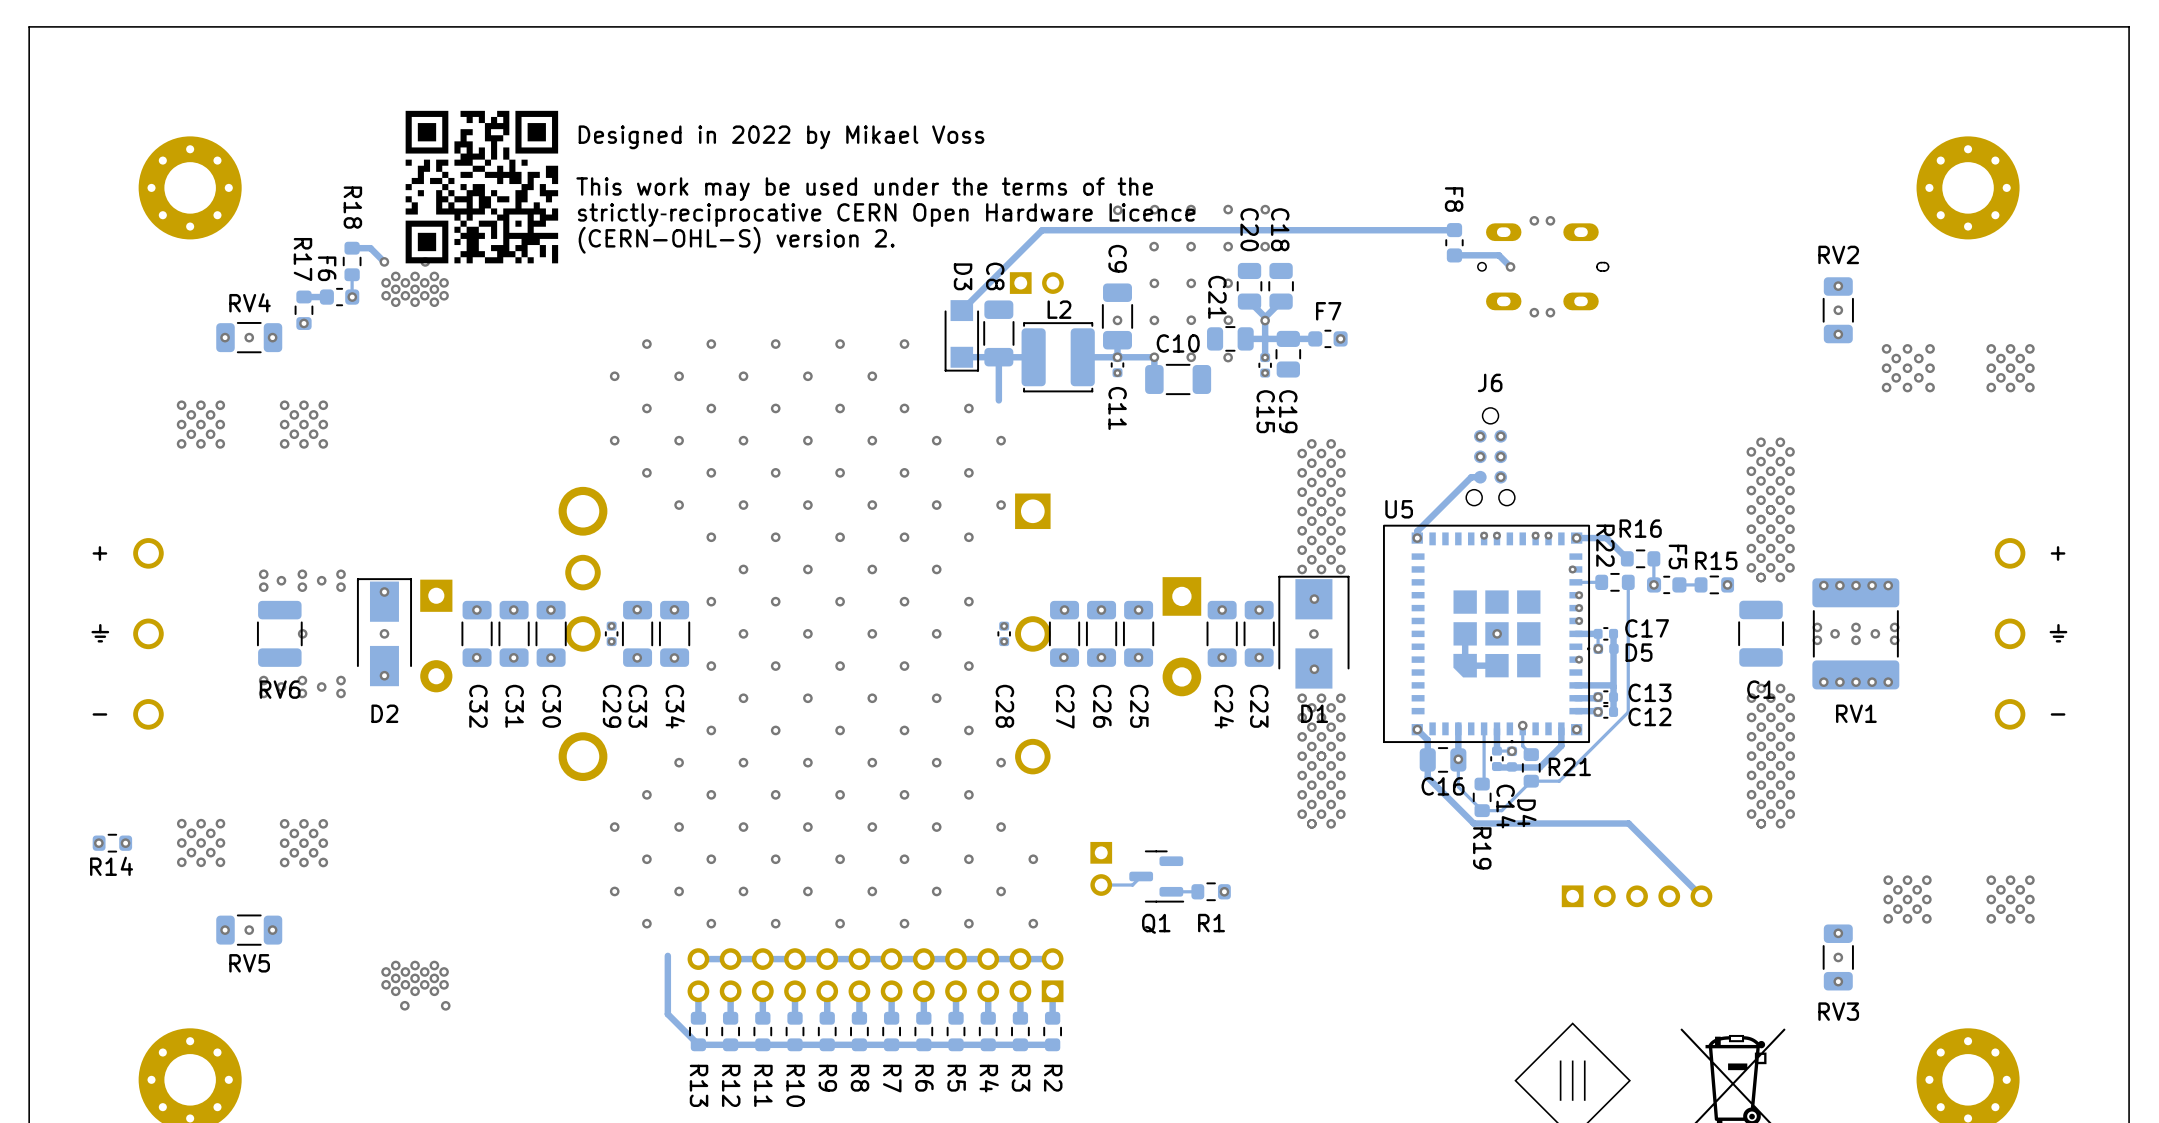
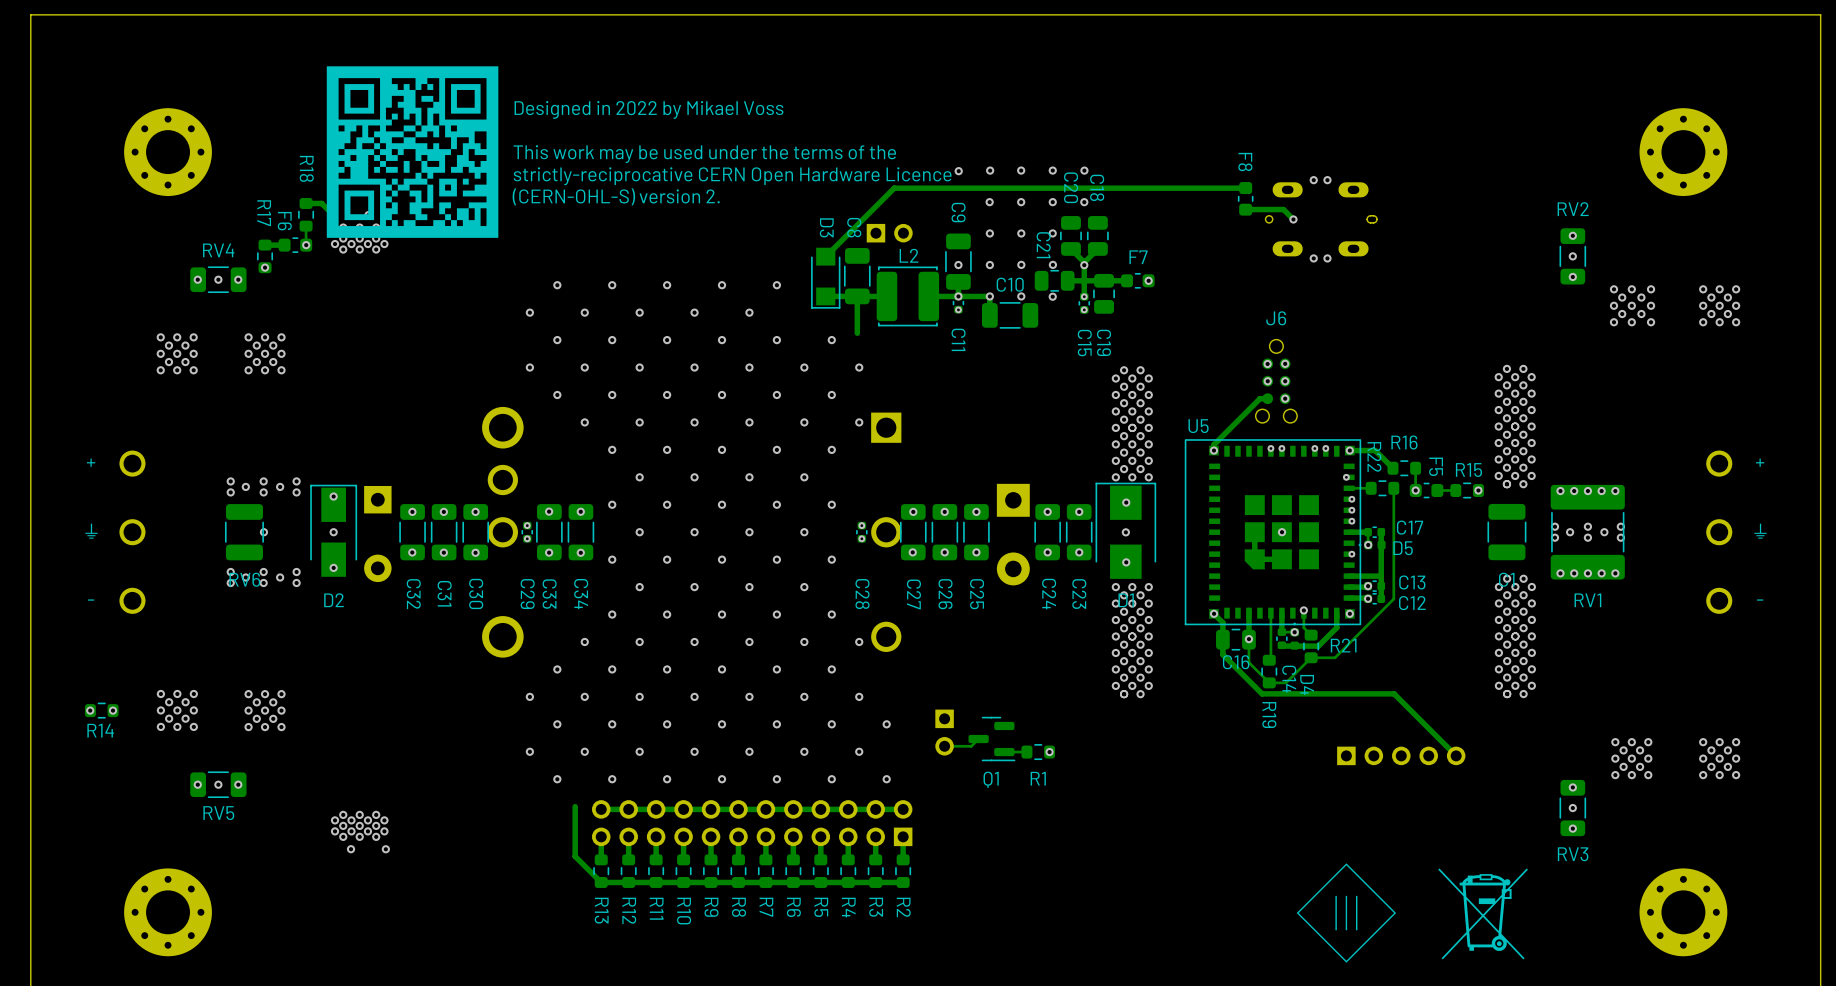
drawing shape: [405, 110, 559, 264] -> [326, 66, 499, 238]
text position: Designed in 2022 by Mikael Voss (781, 137) -> Designed in 2022 by Mikael Voss (648, 109)
text position: This work may be used under the terms of the (864, 189) -> This work may be used under the terms of the (704, 154)
text position: strictly‐reciprocative CERN Open Hardware Licence (886, 215) -> strictly‐reciprocative CERN Open Hardware Licence (732, 176)
text position: (CERN-OHL-S) version 2. (736, 240) -> (CERN-OHL-S) version 2. (616, 196)

